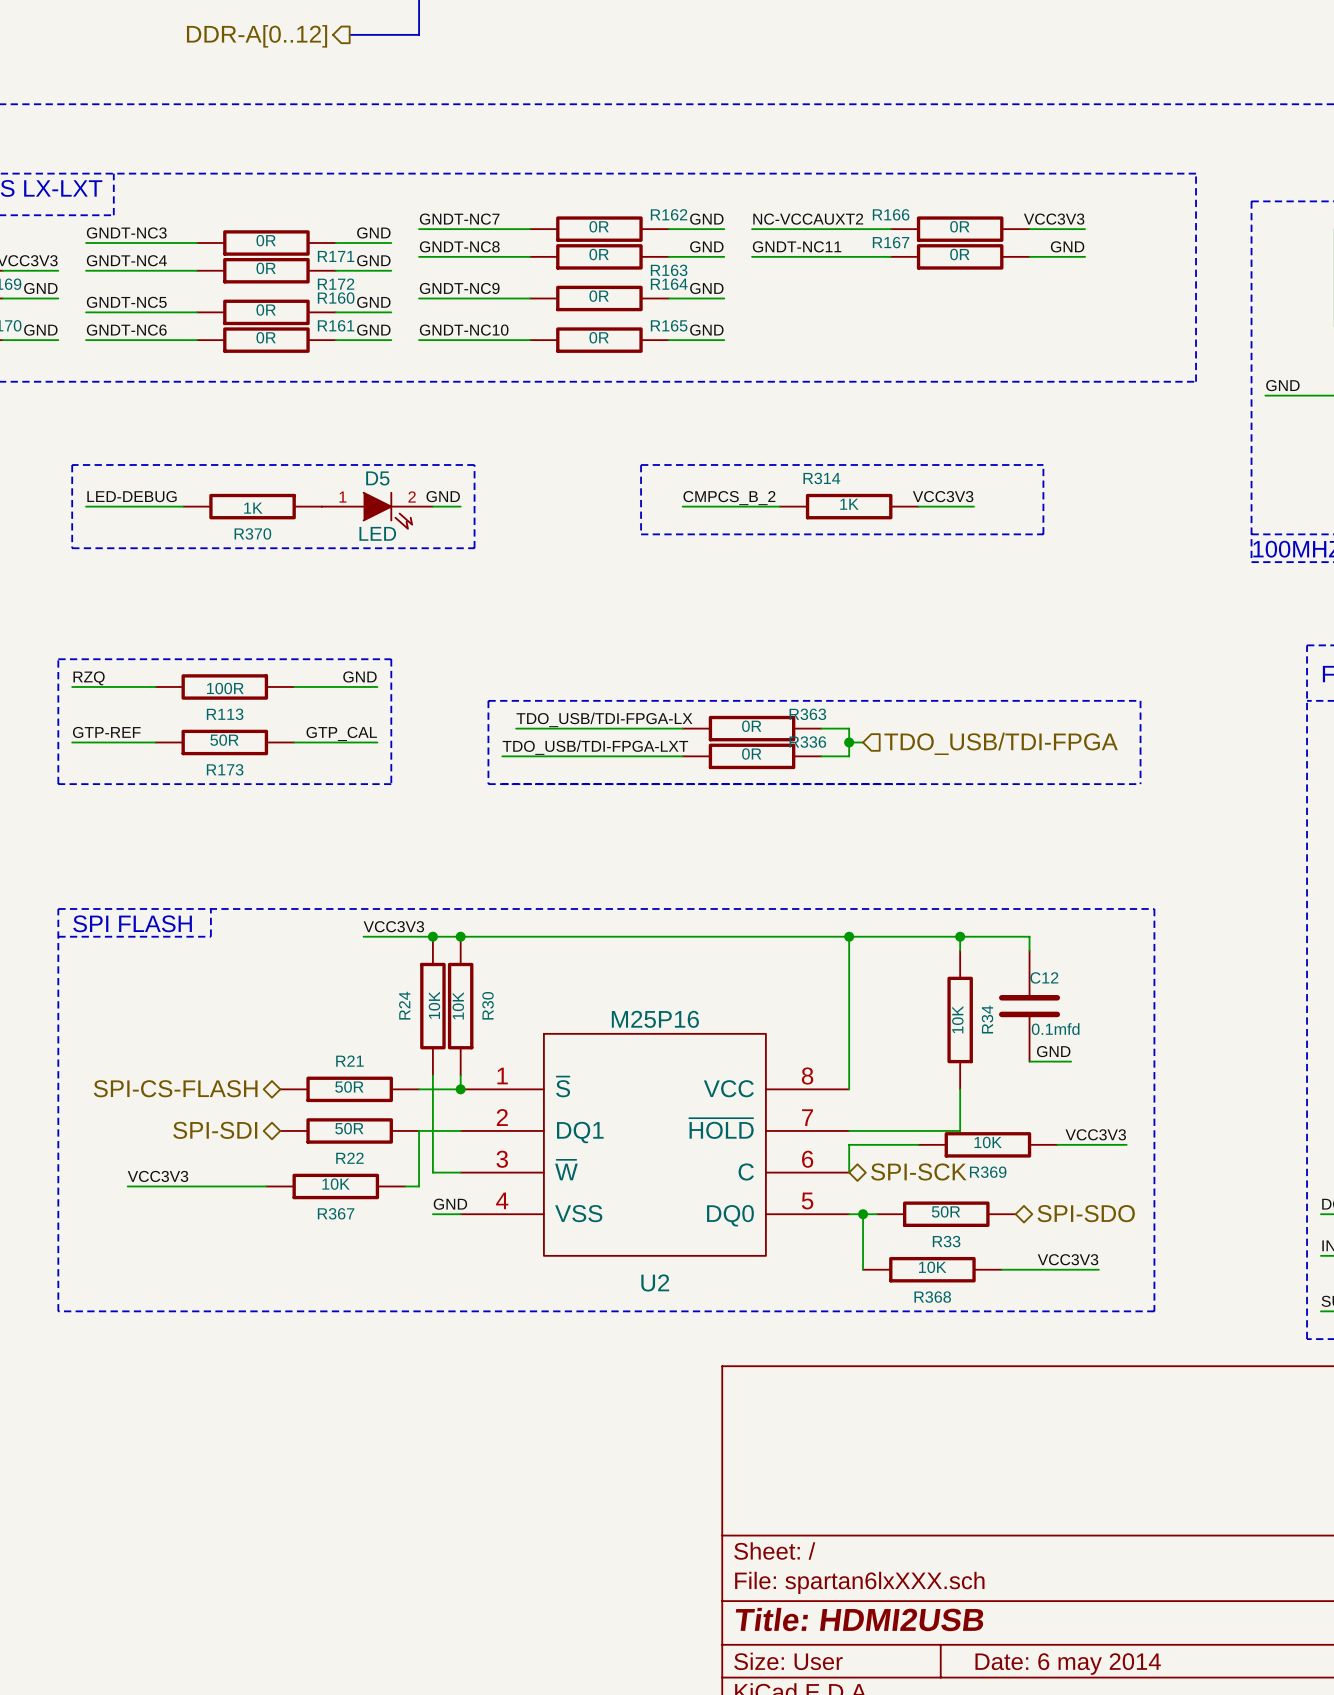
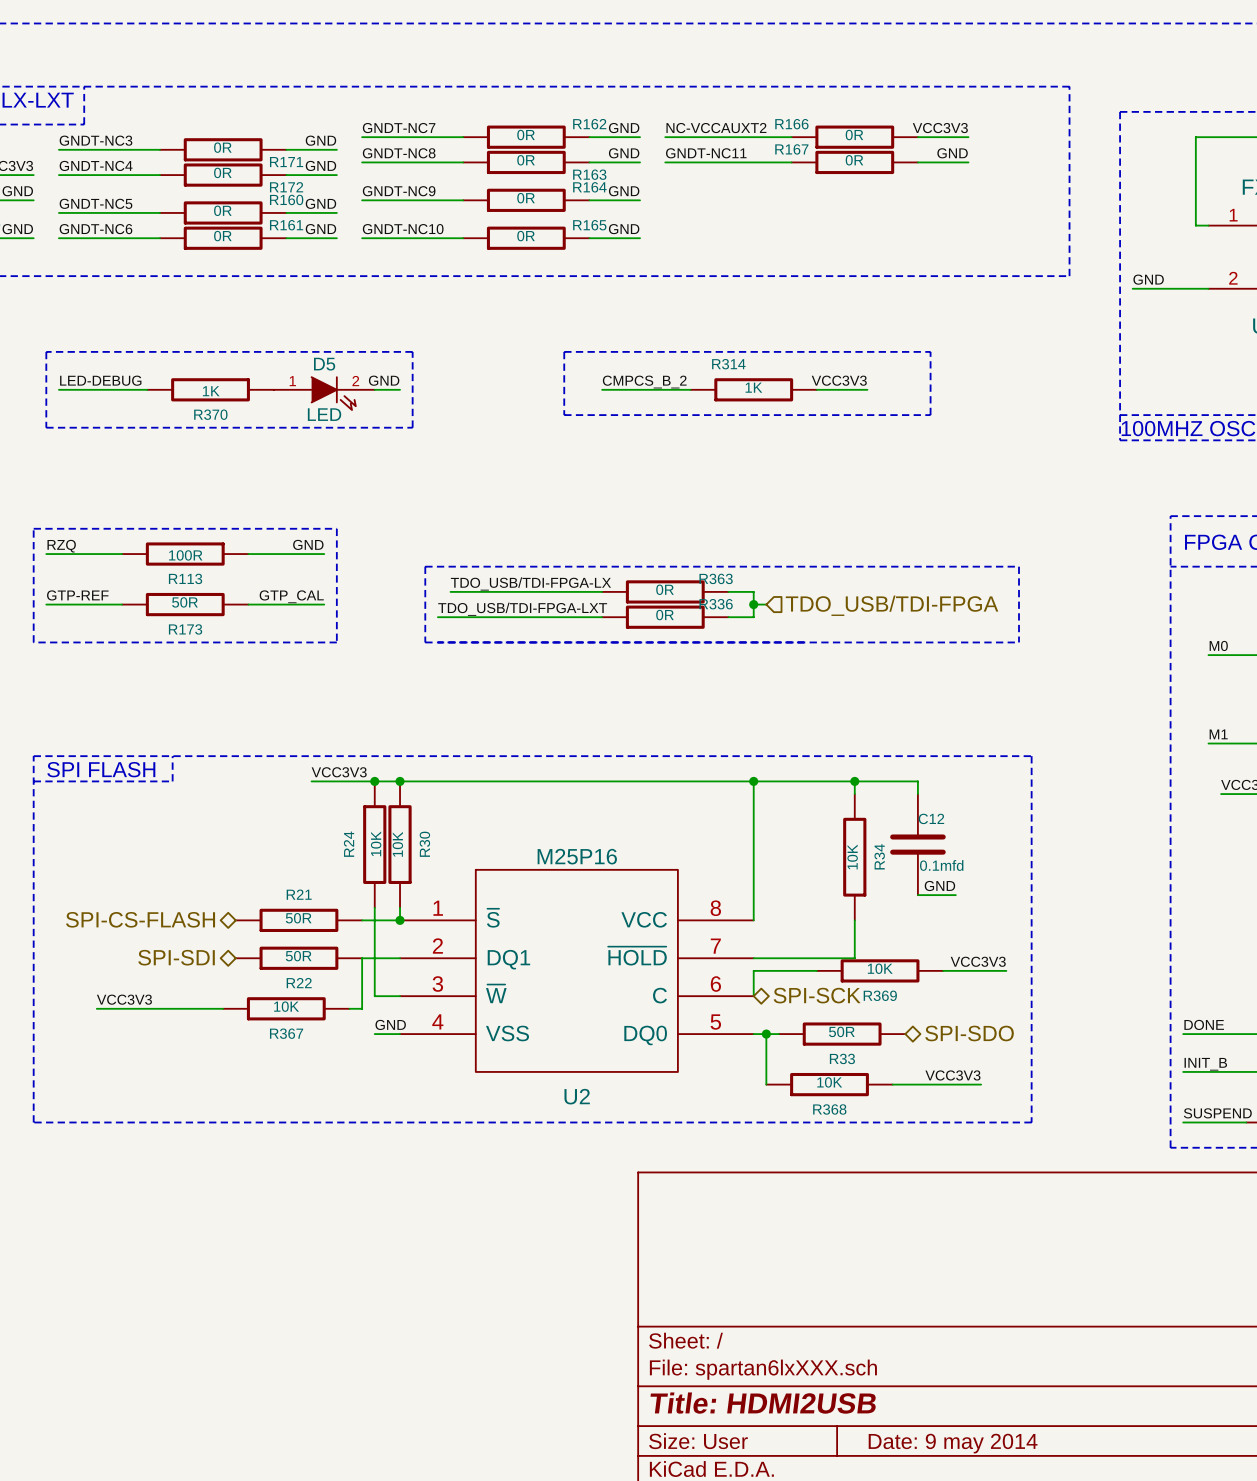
title block: Date: 6 may 2014 (1068, 1664) -> Date: 9 may 2014 (953, 1443)

